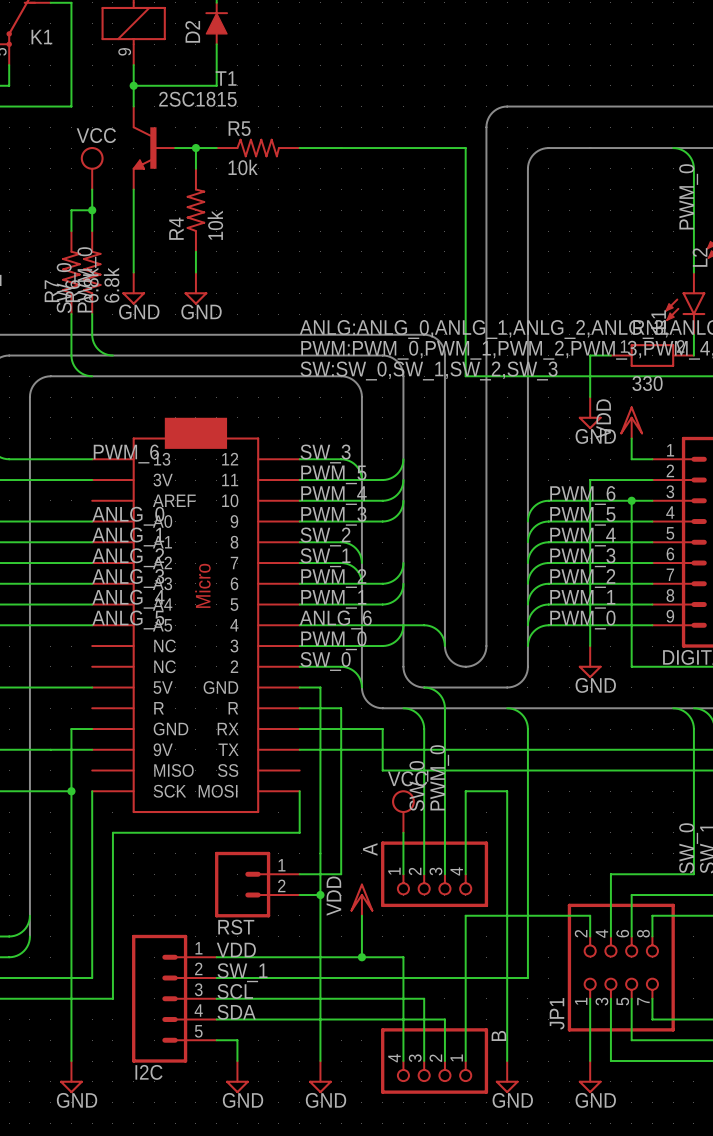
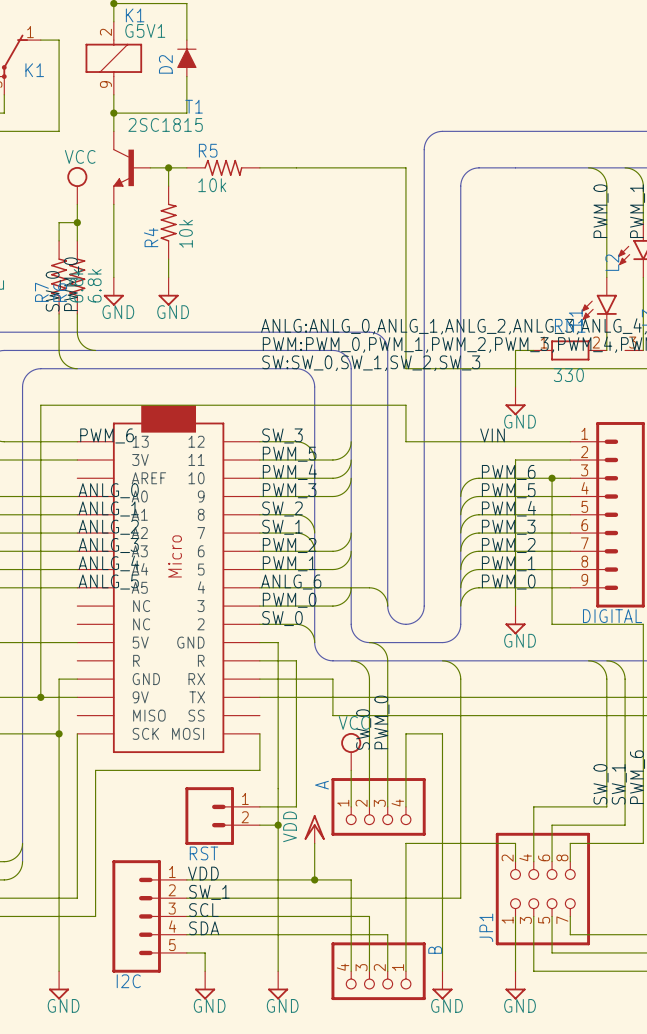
power symbol: VDD (631, 422) -> none
wire: (631, 438) (631, 459) -> (40, 697) (40, 405) (405, 405) (405, 441) (552, 441)
label: none -> VIN (492, 435)
junction: none -> (40, 697)

